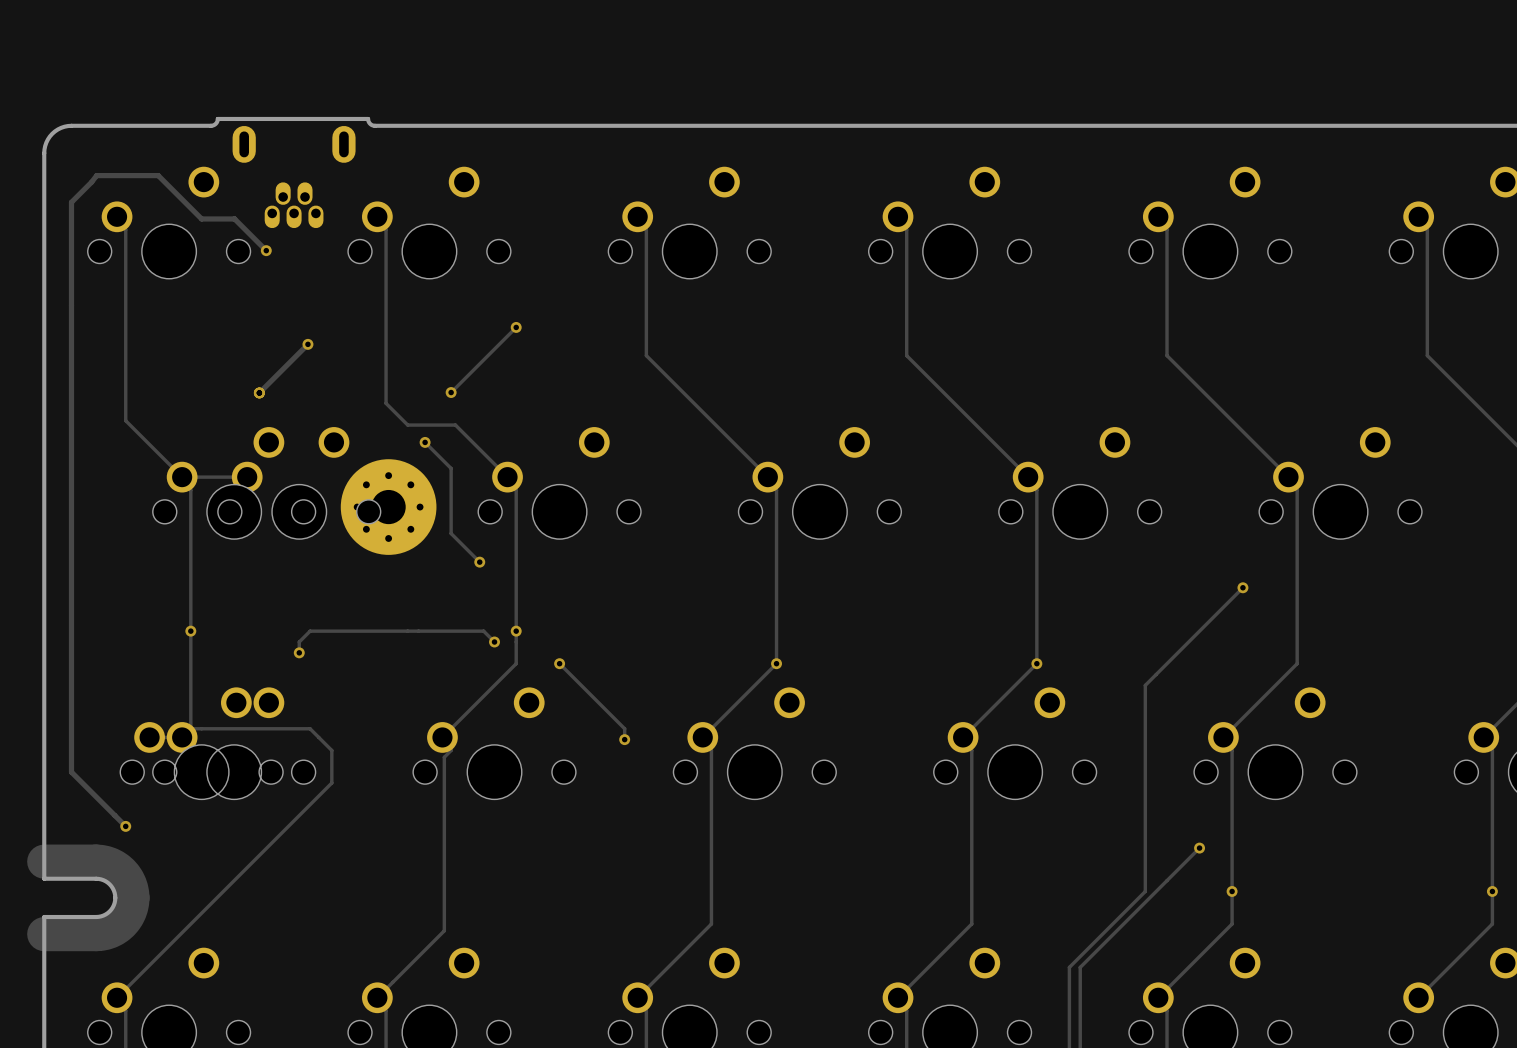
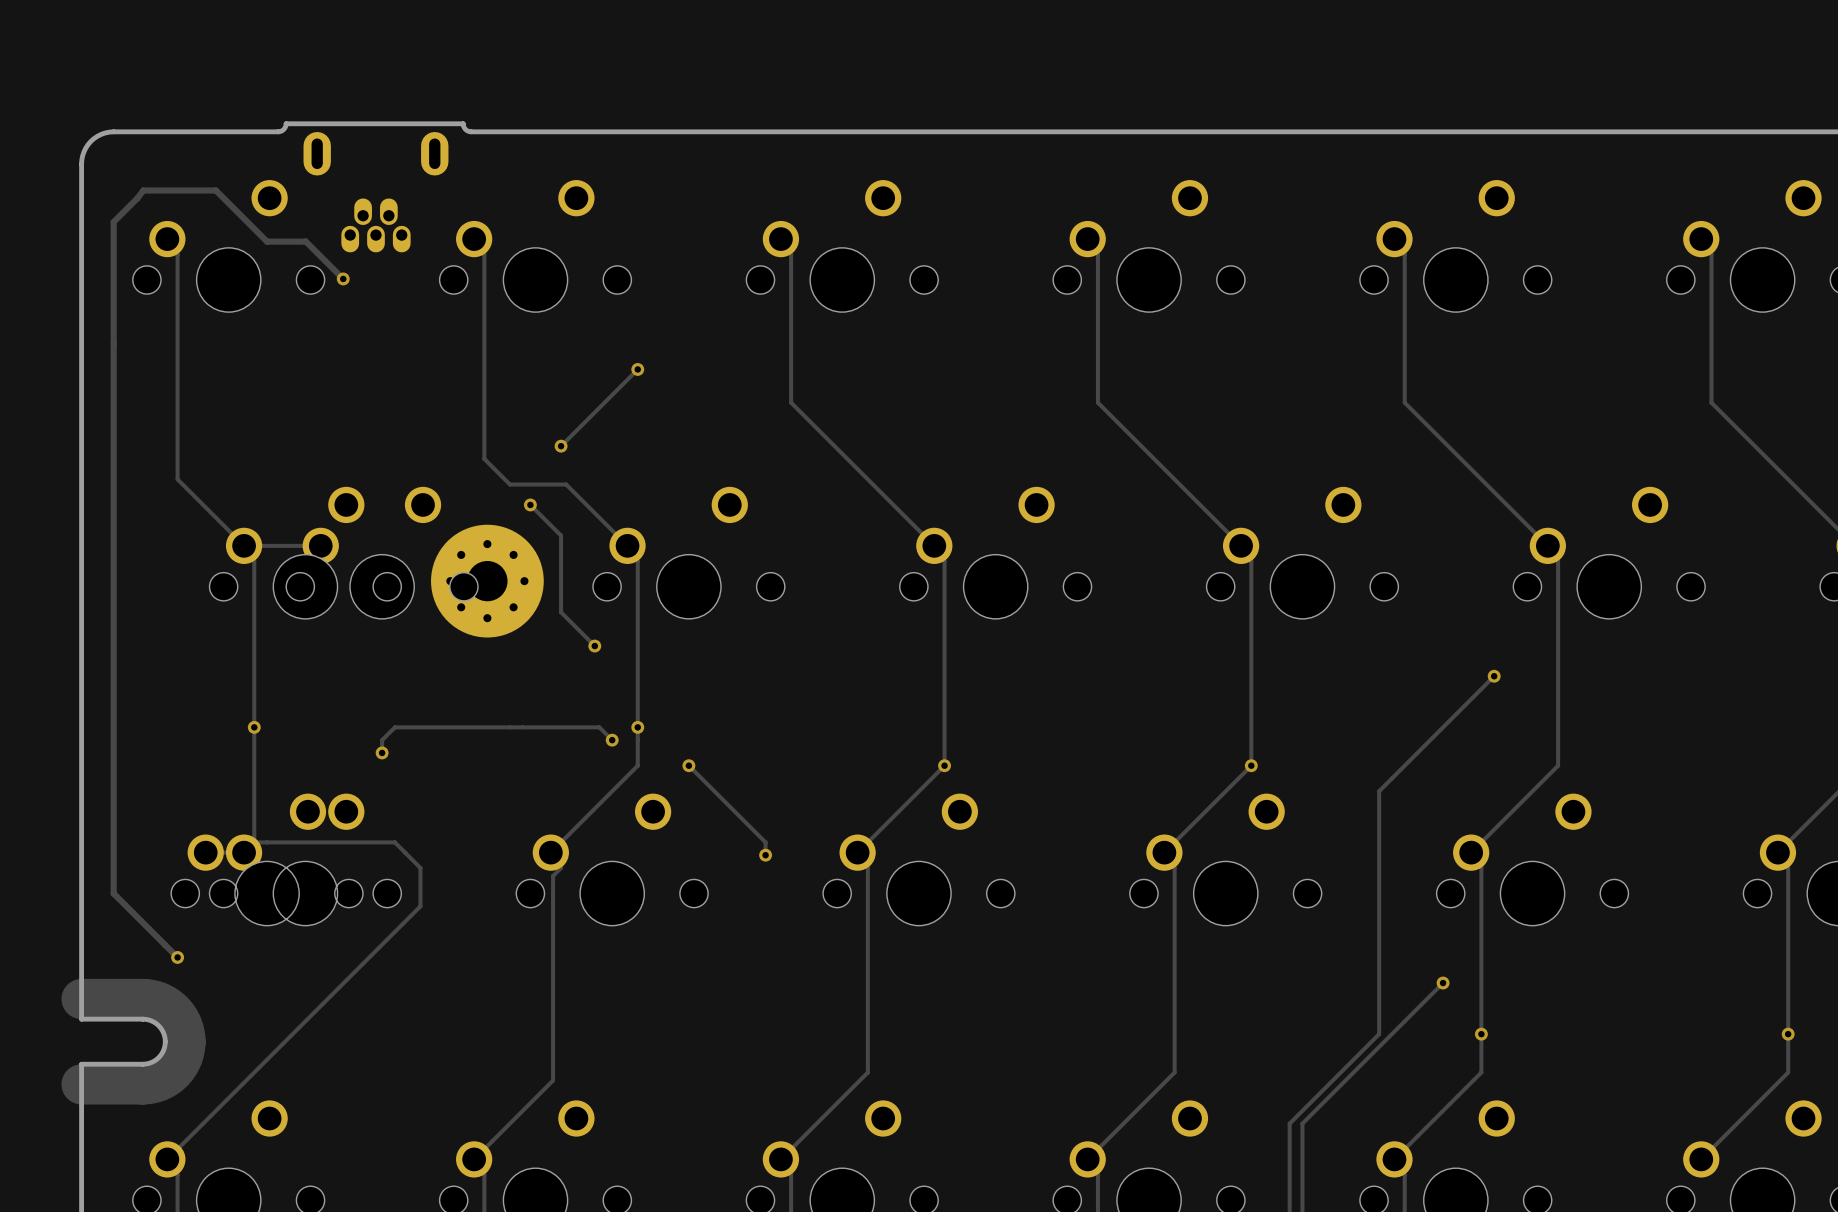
track: (307, 344) (259, 392) -> none
via: (307, 344) -> none
via: (259, 392) -> none

